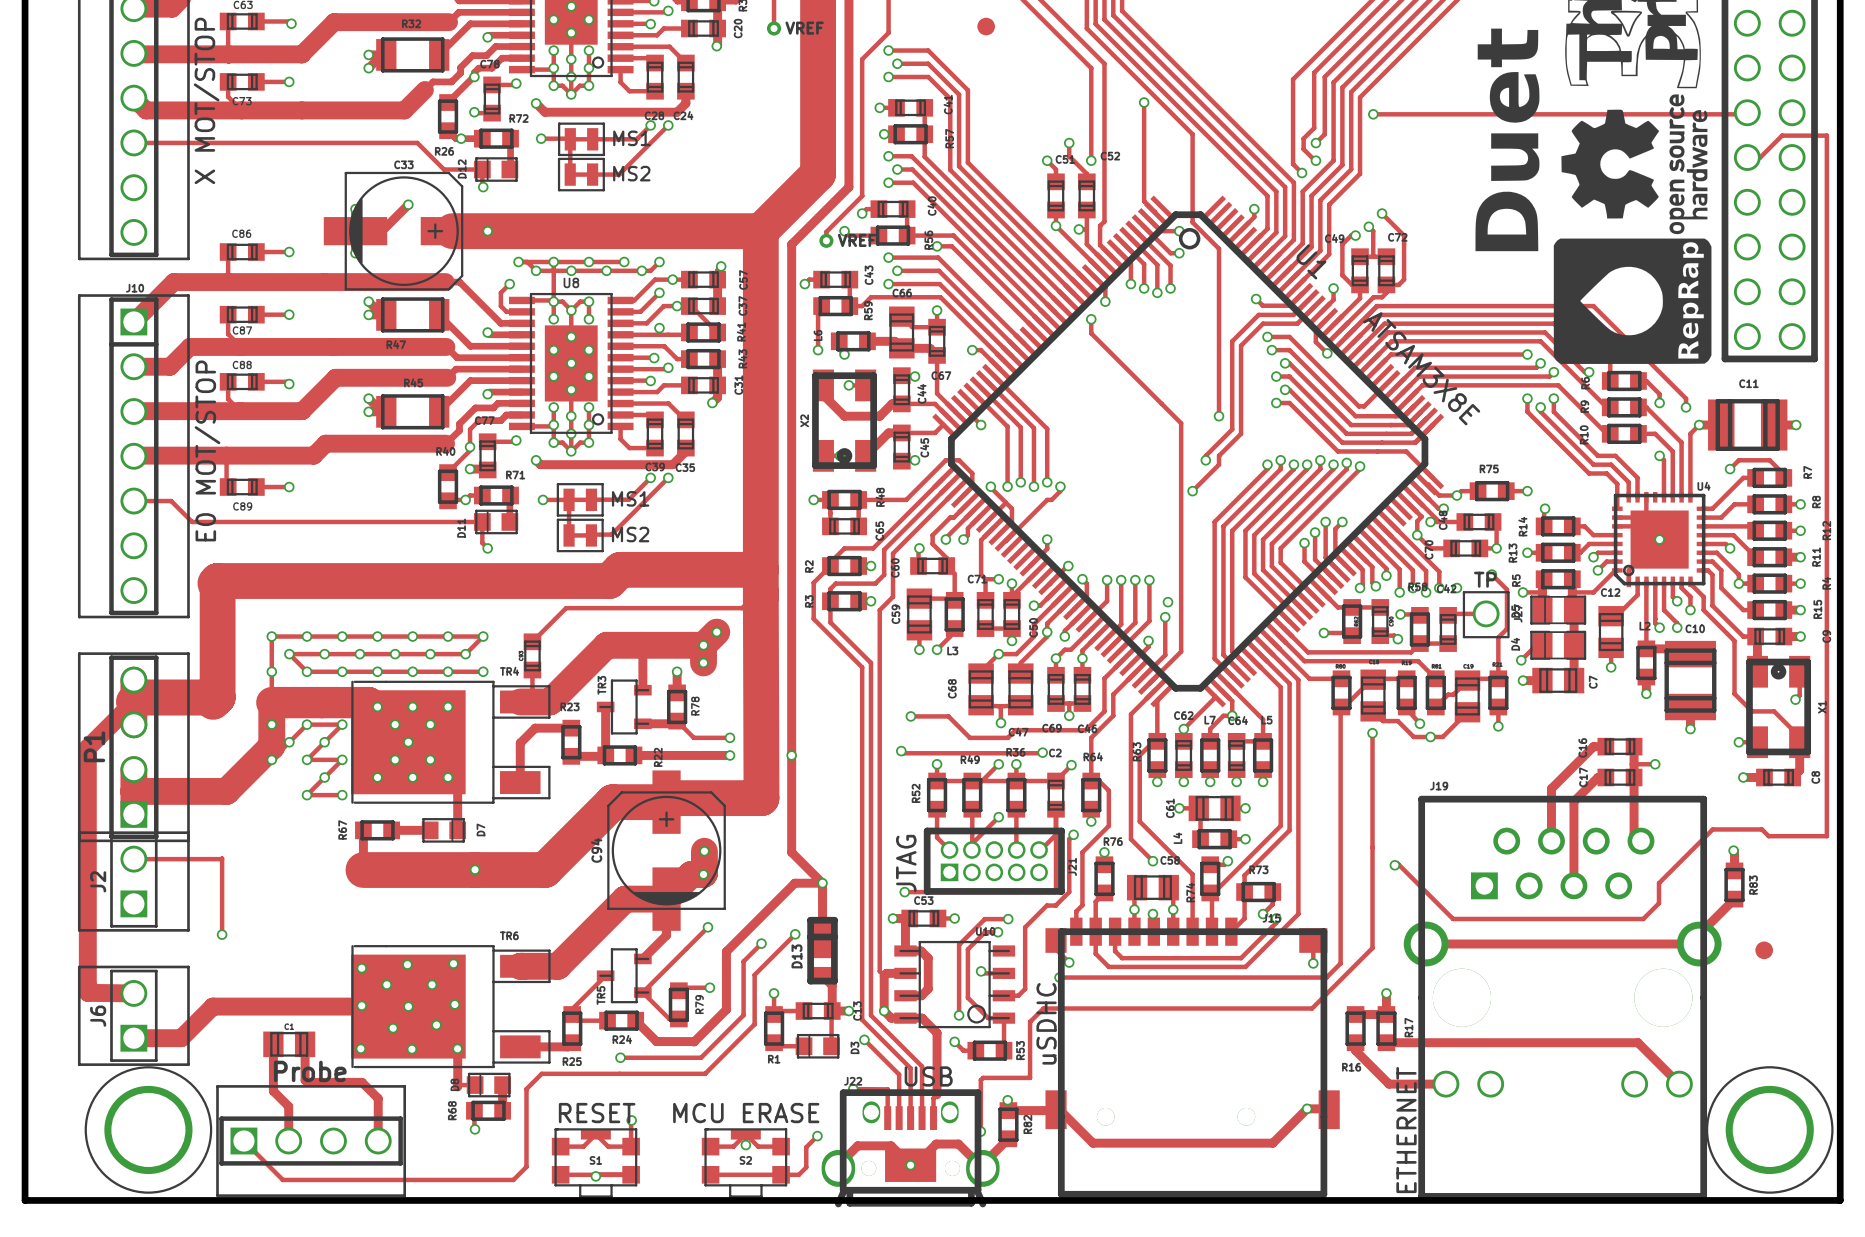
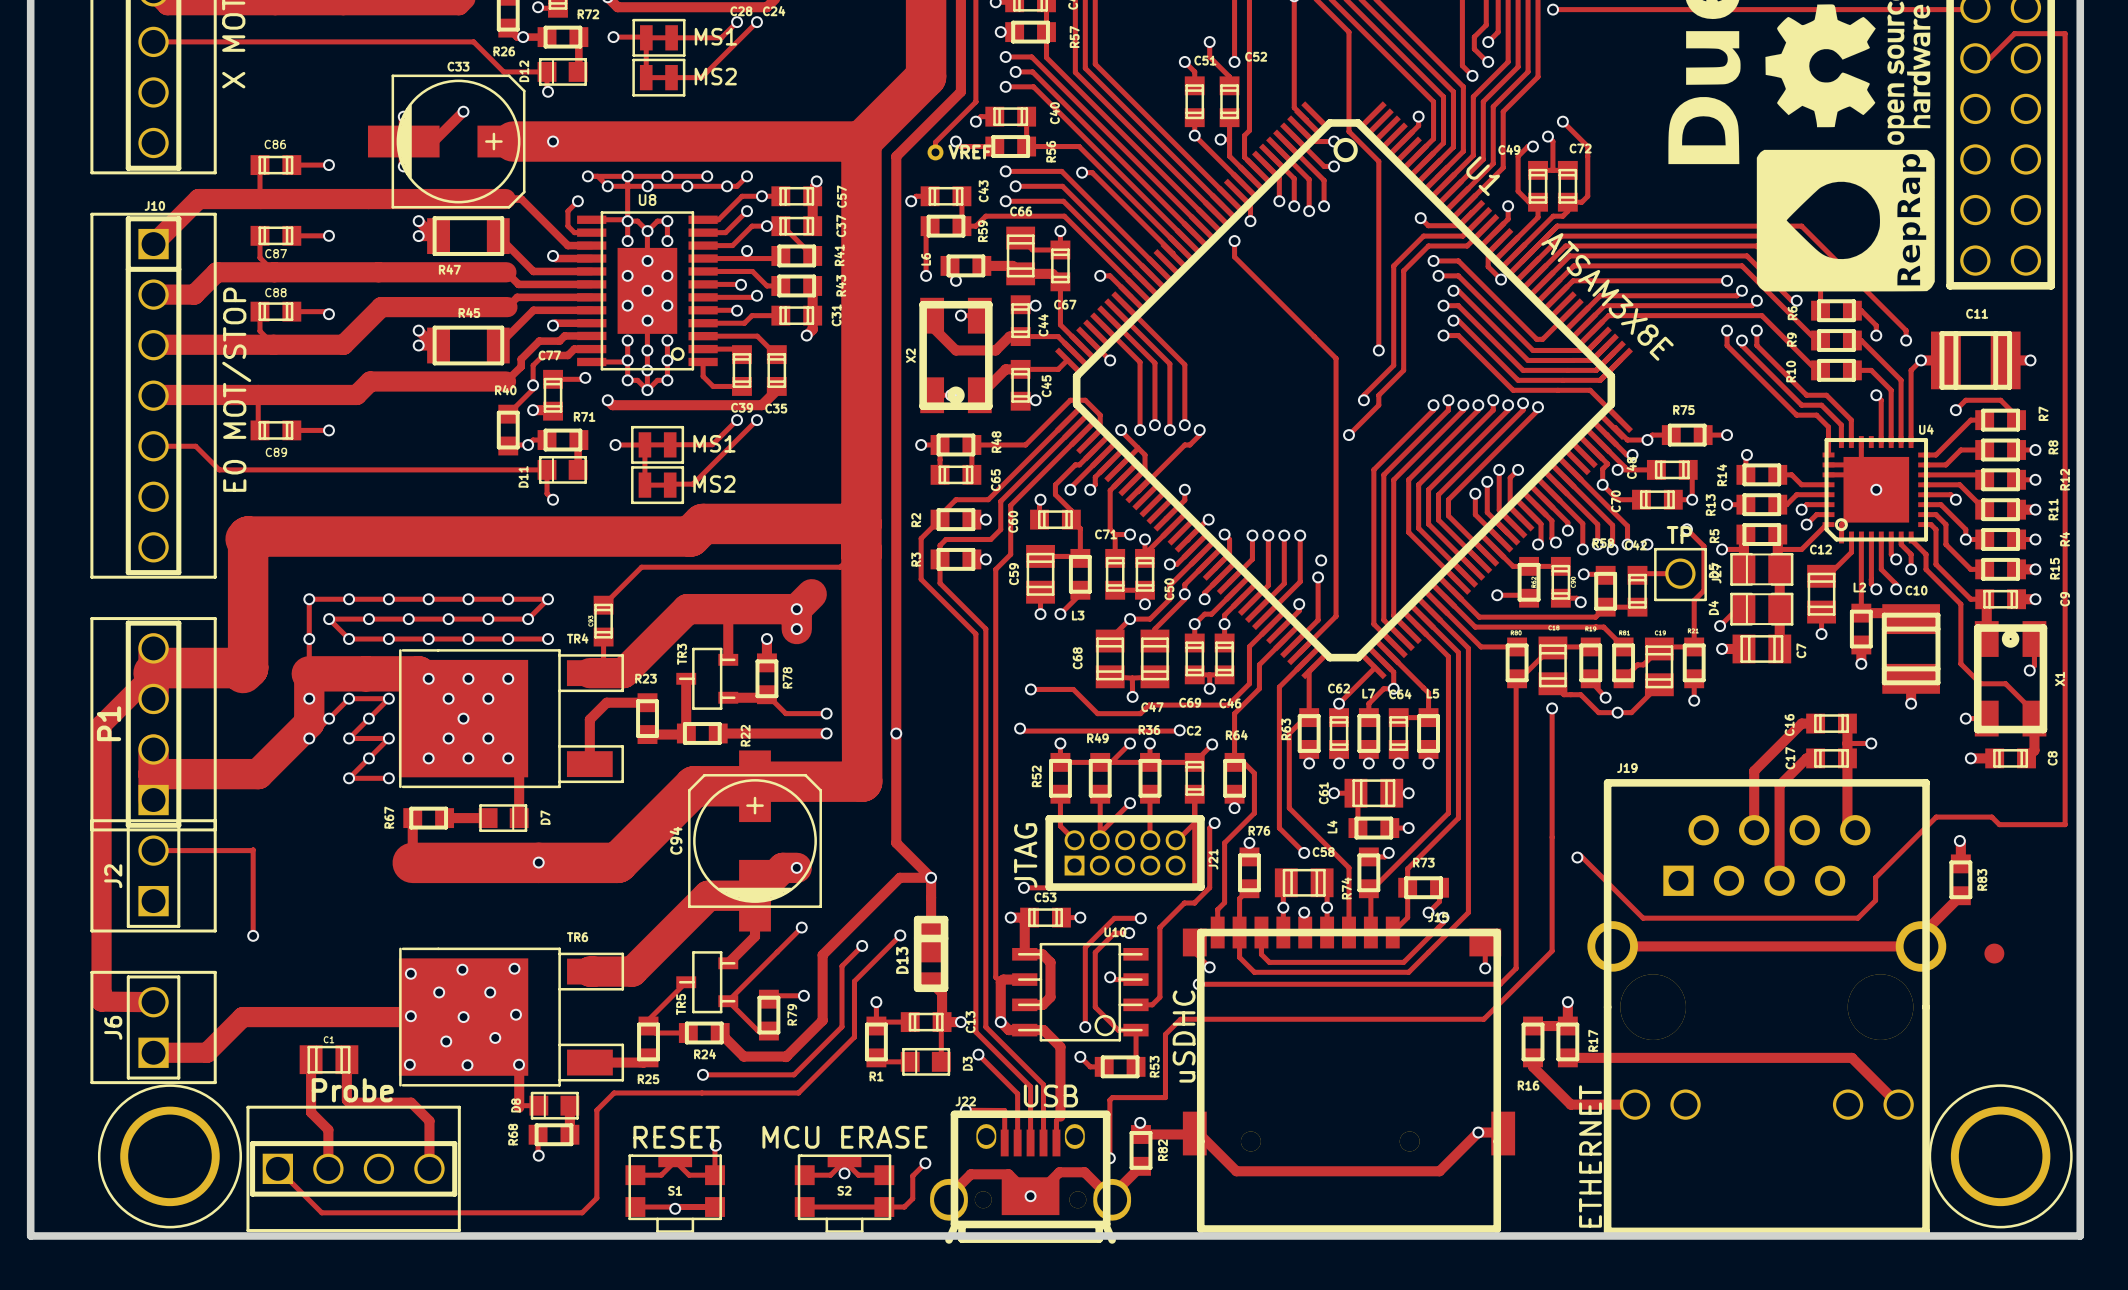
track: (937, 246) (951, 246) (1036, 331) -> (1082, 172) (1092, 172) (1173, 254)
via position: (937, 246) -> (1082, 172)
via: (716, 632) -> none
track: (704, 851) (703, 874) -> none
via: (704, 851) -> none

